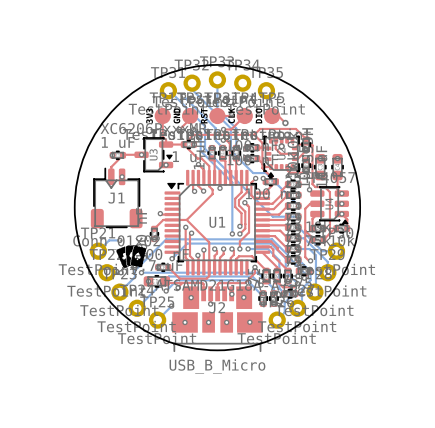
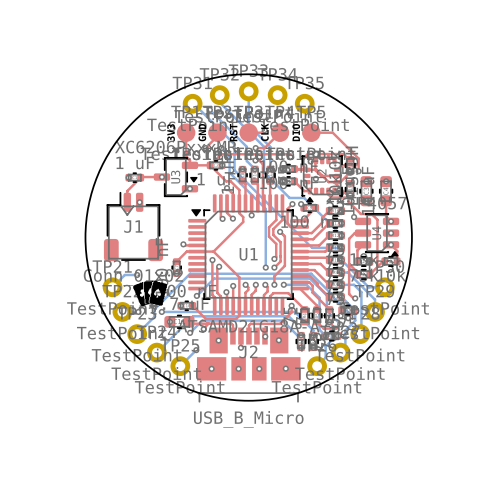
top track: (278, 116) (285, 123) -> (318, 132) (332, 132) (358, 158) (358, 171)
via: (285, 123) -> none
via: (287, 134) -> none
top track: none -> (303, 158) (307, 154) (343, 154) (348, 159)
via: none -> (310, 161)
via: (281, 146) -> none
via: none -> (358, 171)
via: none -> (315, 178)
top track: (273, 179) (262, 168) (262, 142) (254, 134) (260, 128) (295, 128) (312, 145) (312, 184) -> (296, 169) (316, 169) (328, 182) (334, 182) (348, 196) (348, 201) (357, 210)

